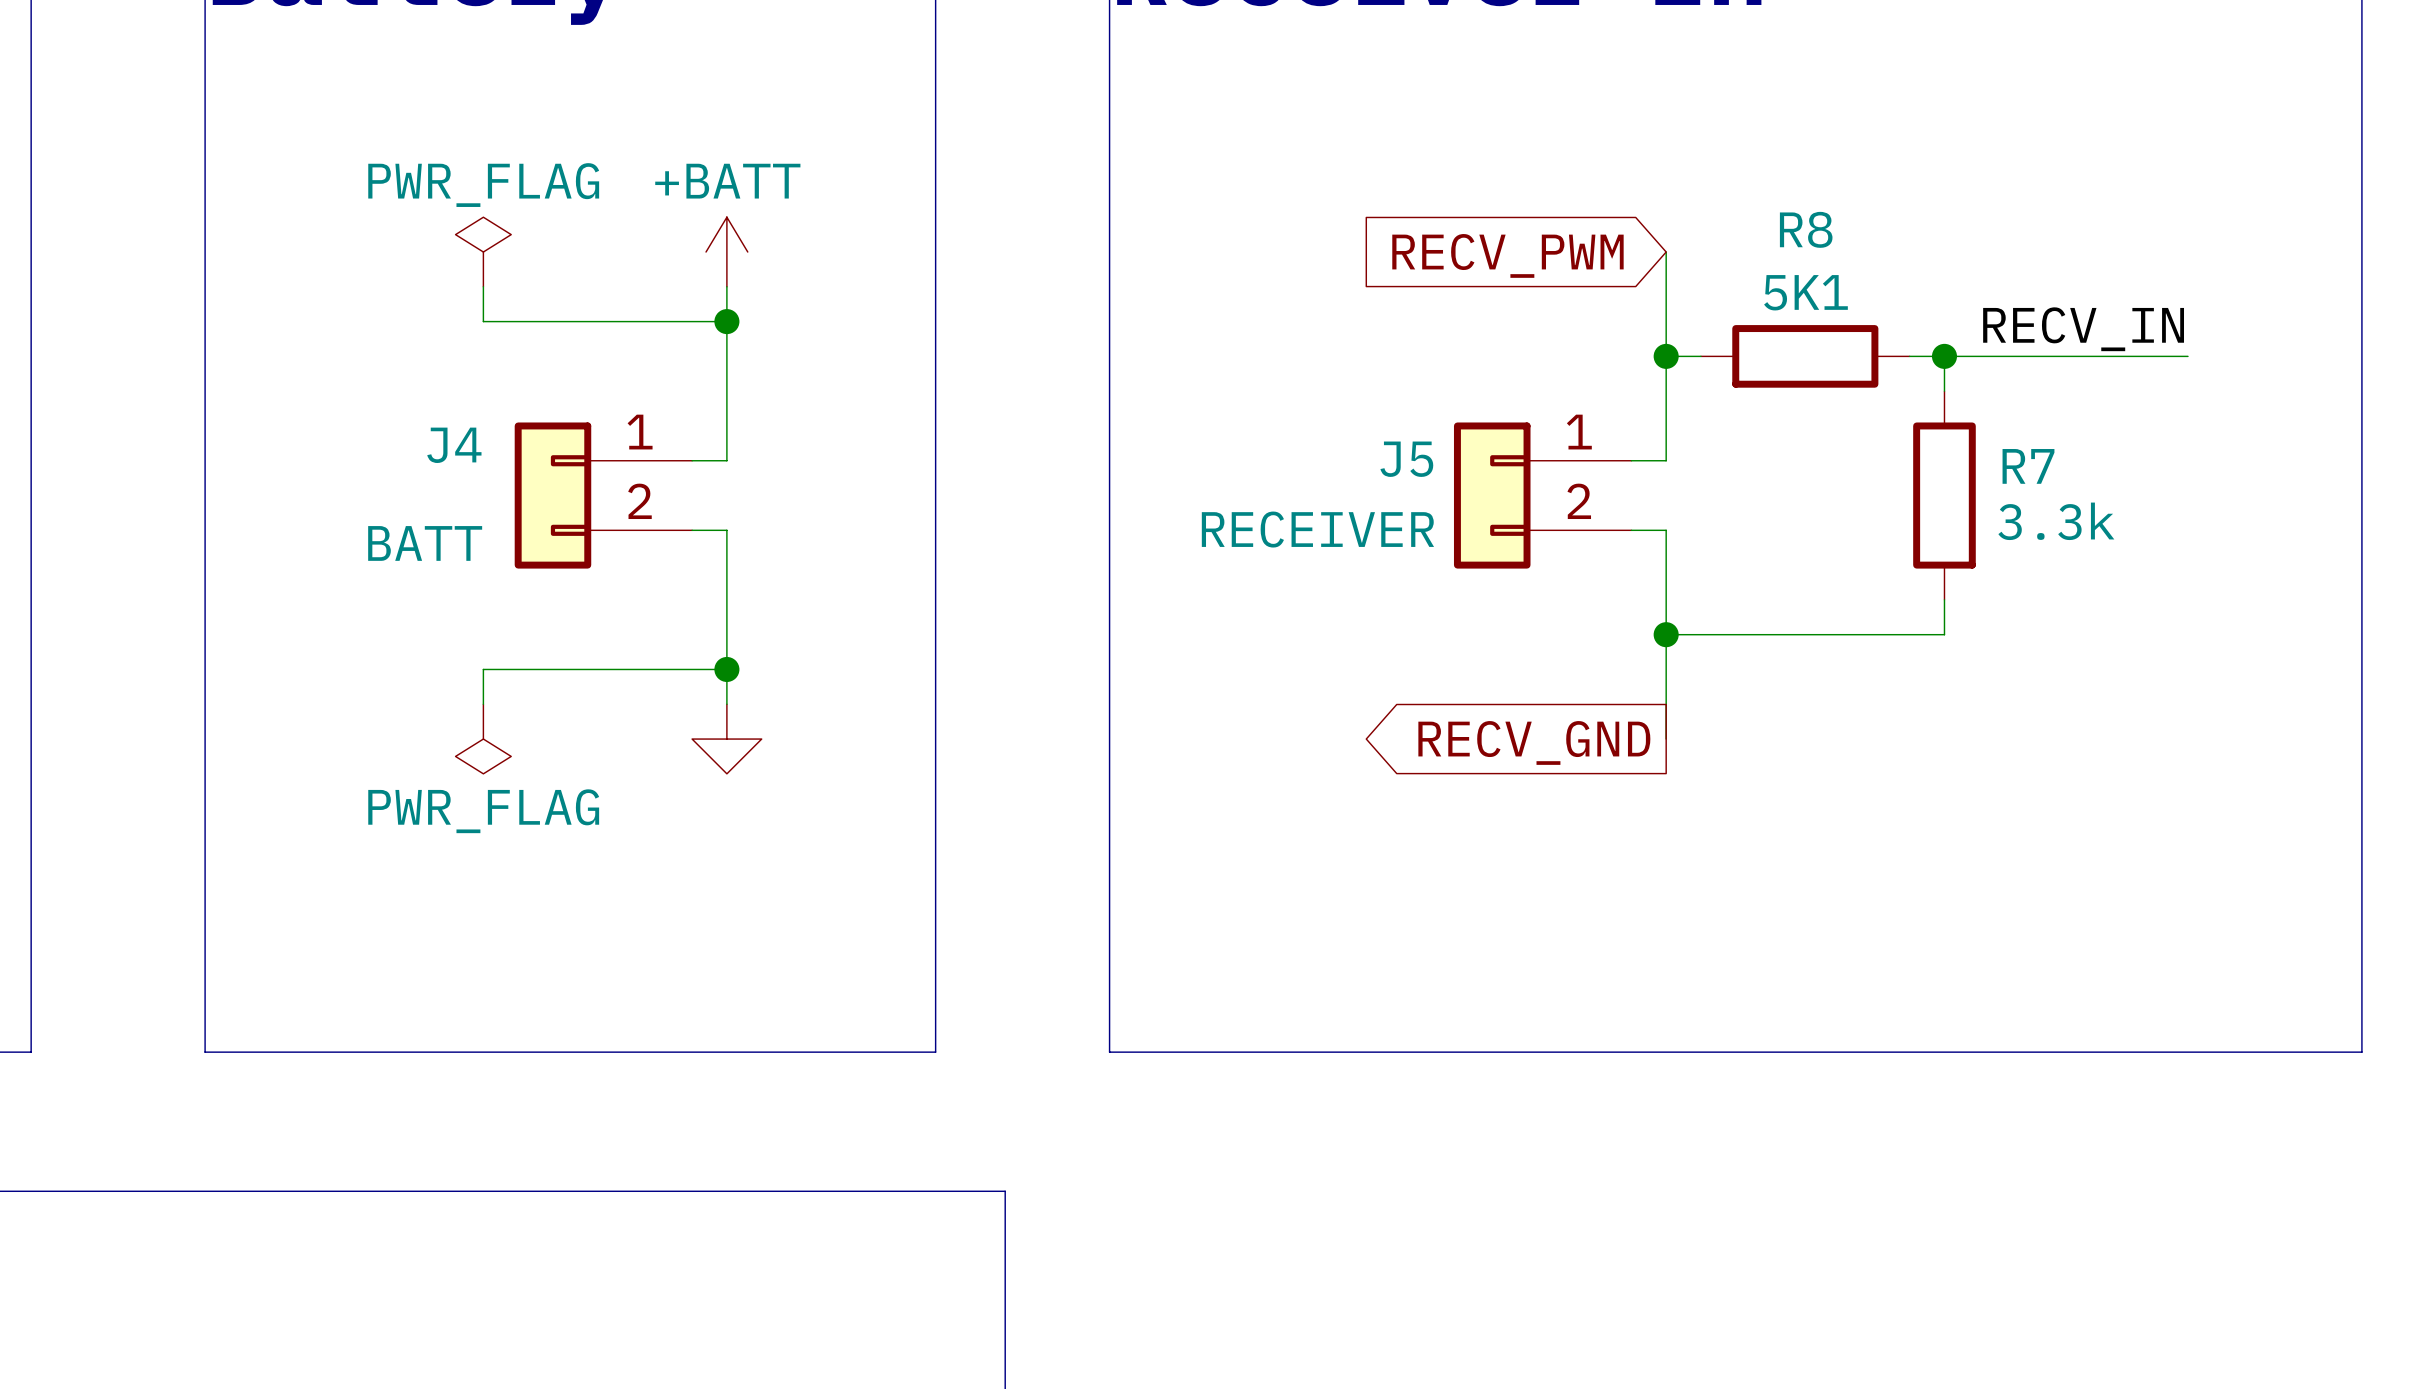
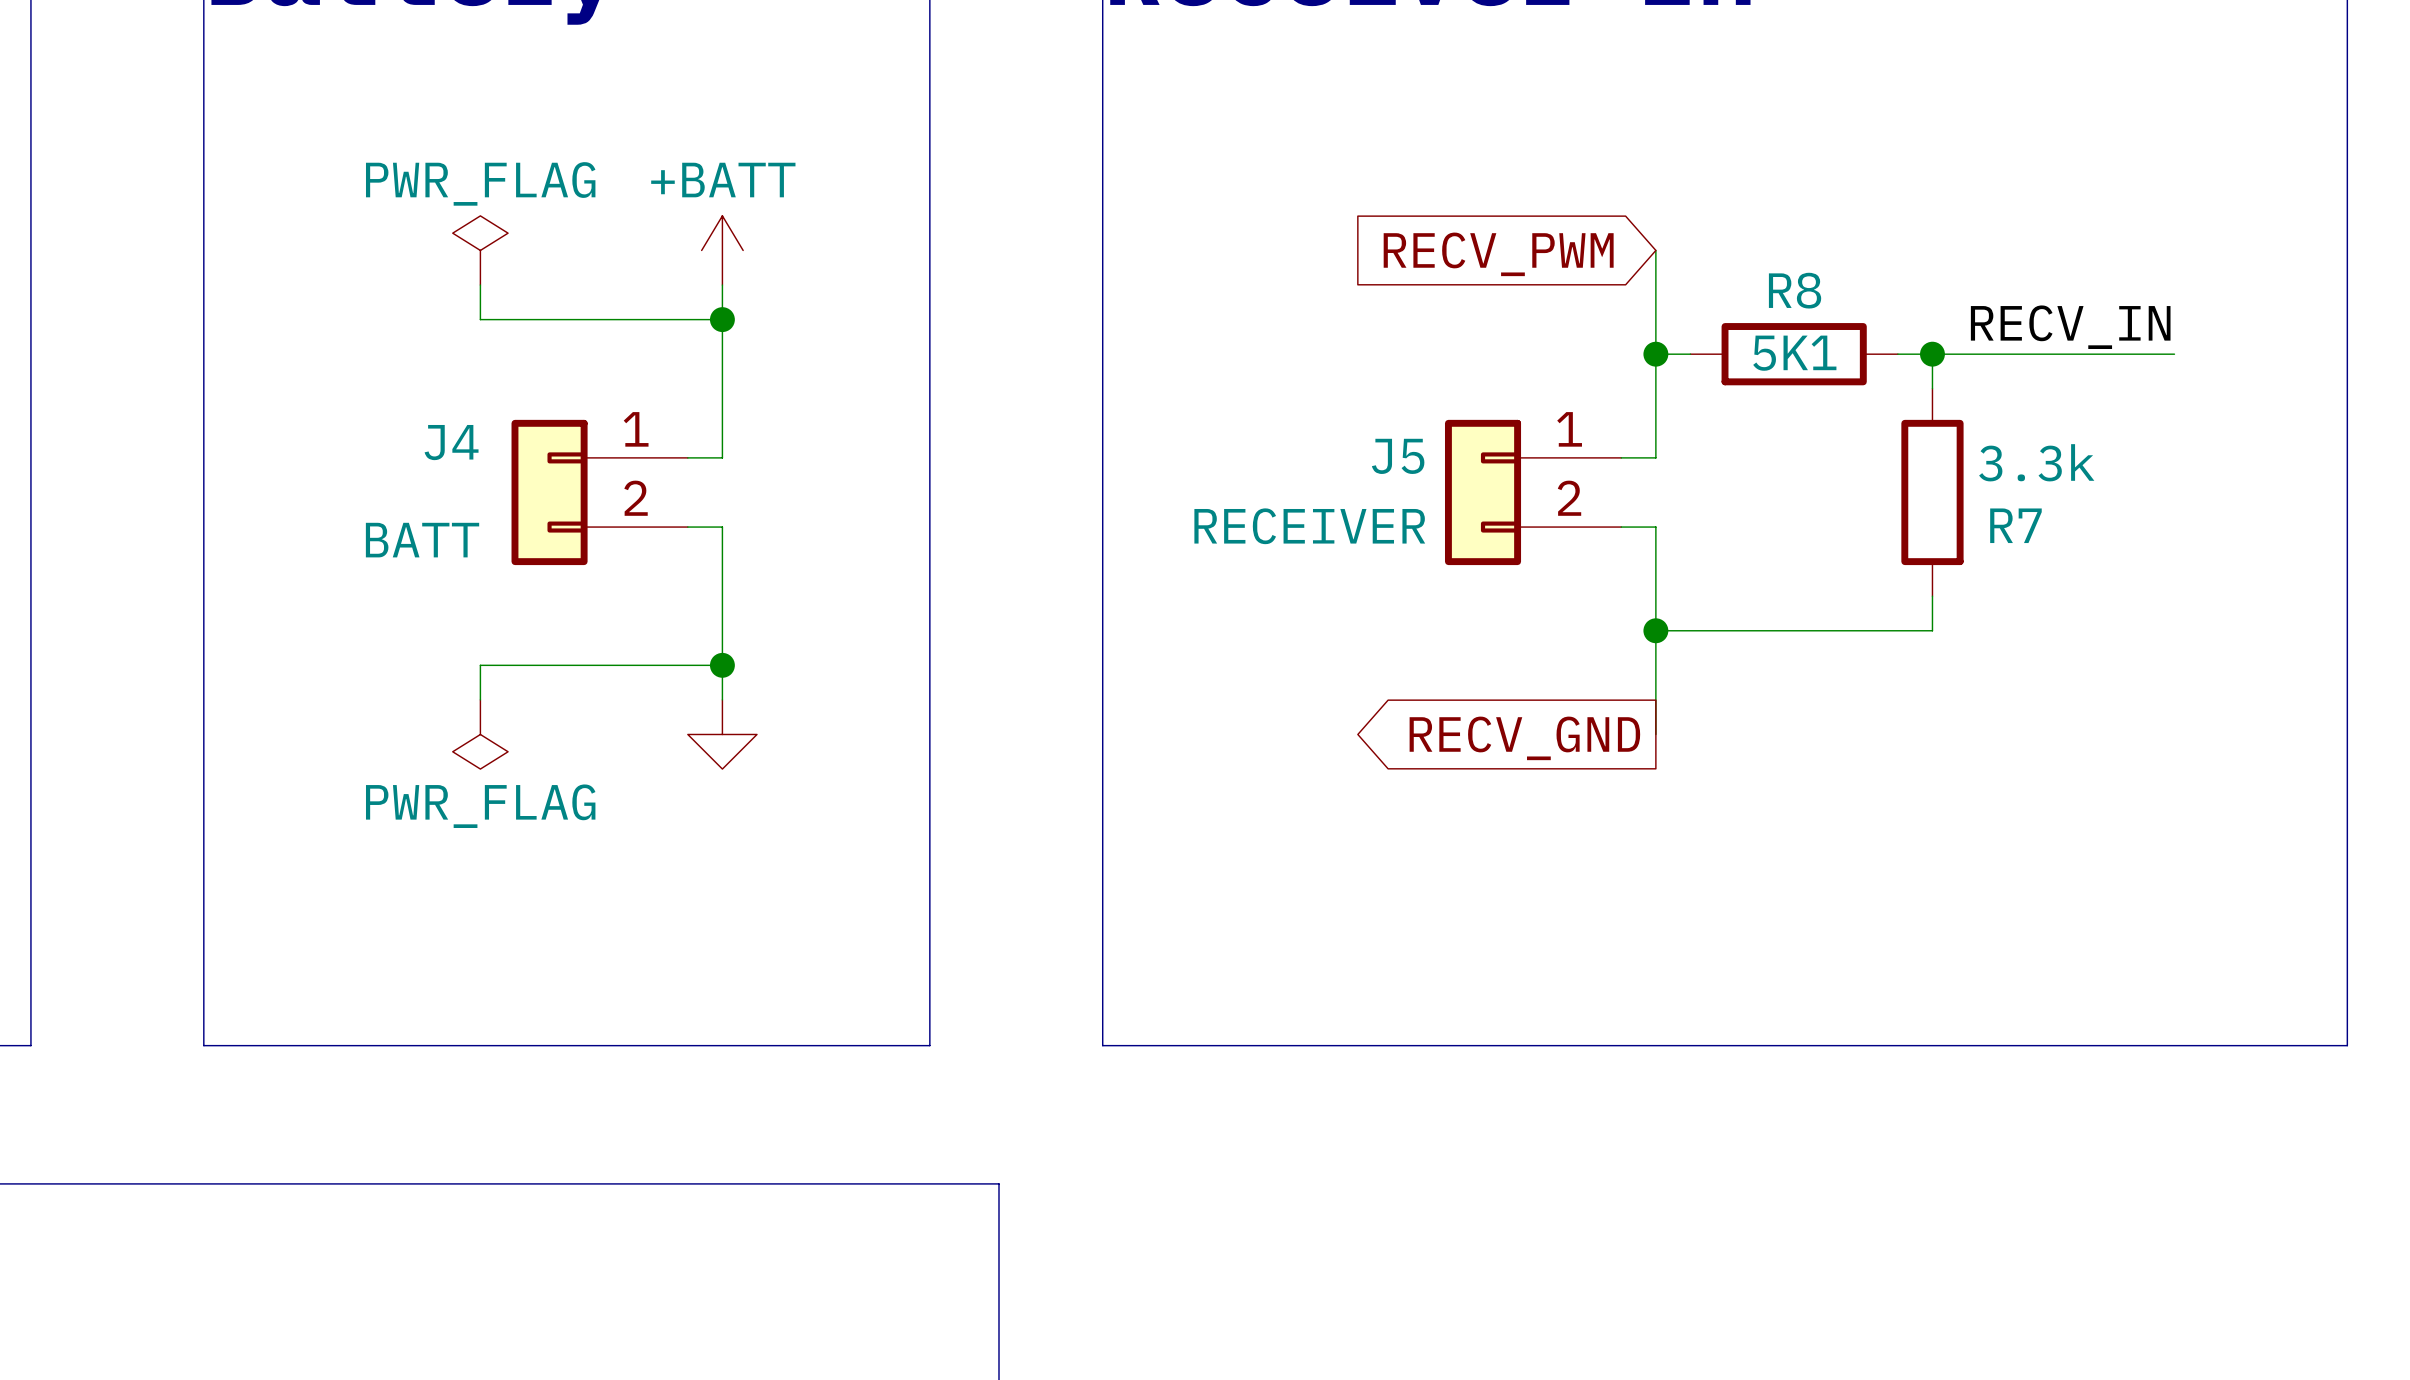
R8 name position: R8 (1806, 229) -> R8 (1795, 290)
R8 value position: 5K1 (1805, 292) -> 5K1 (1794, 353)
R7 name position: R7 (2028, 466) -> R7 (2015, 525)
R7 value position: 3.3k (2056, 521) -> 3.3k (2036, 462)

